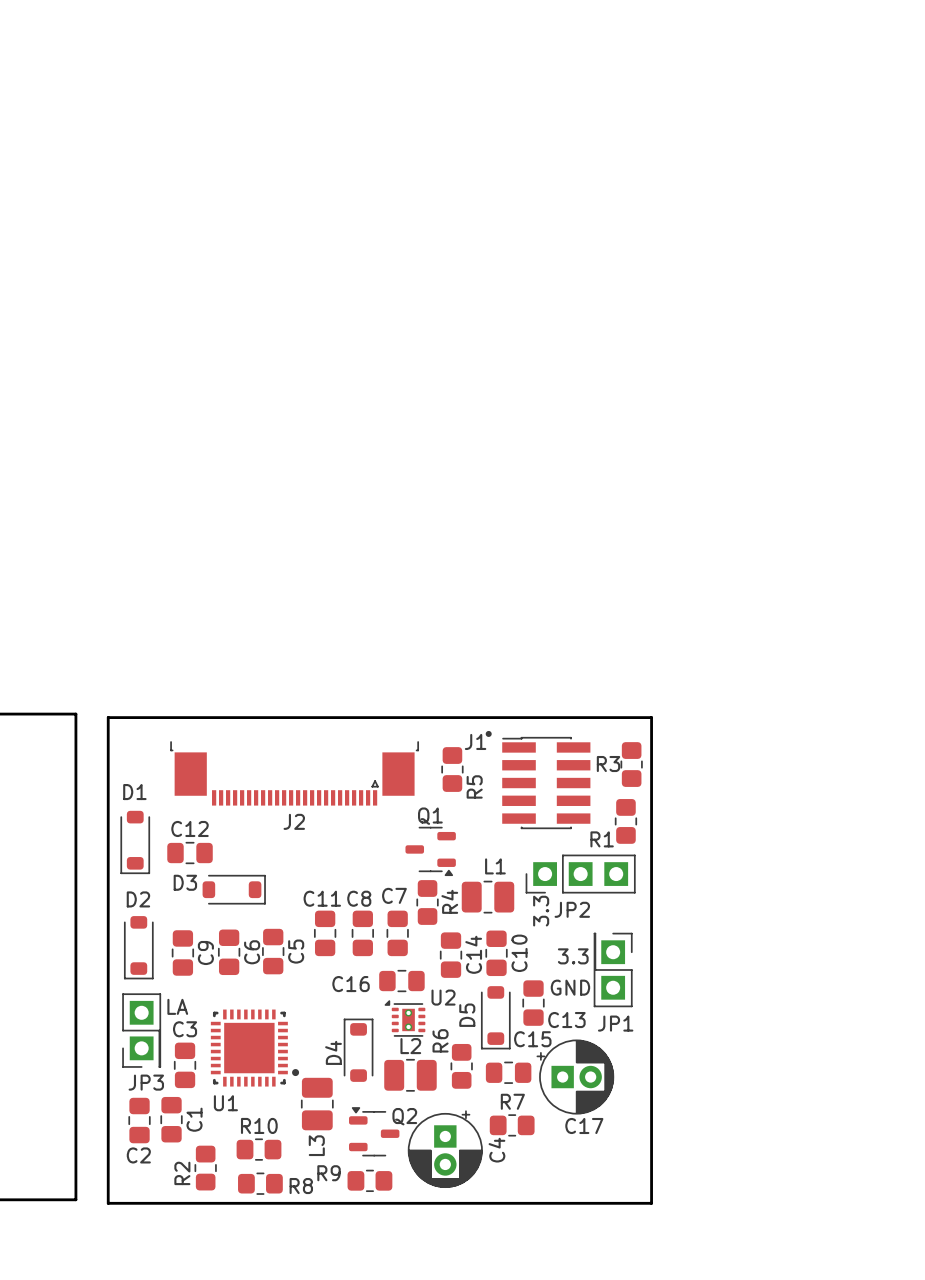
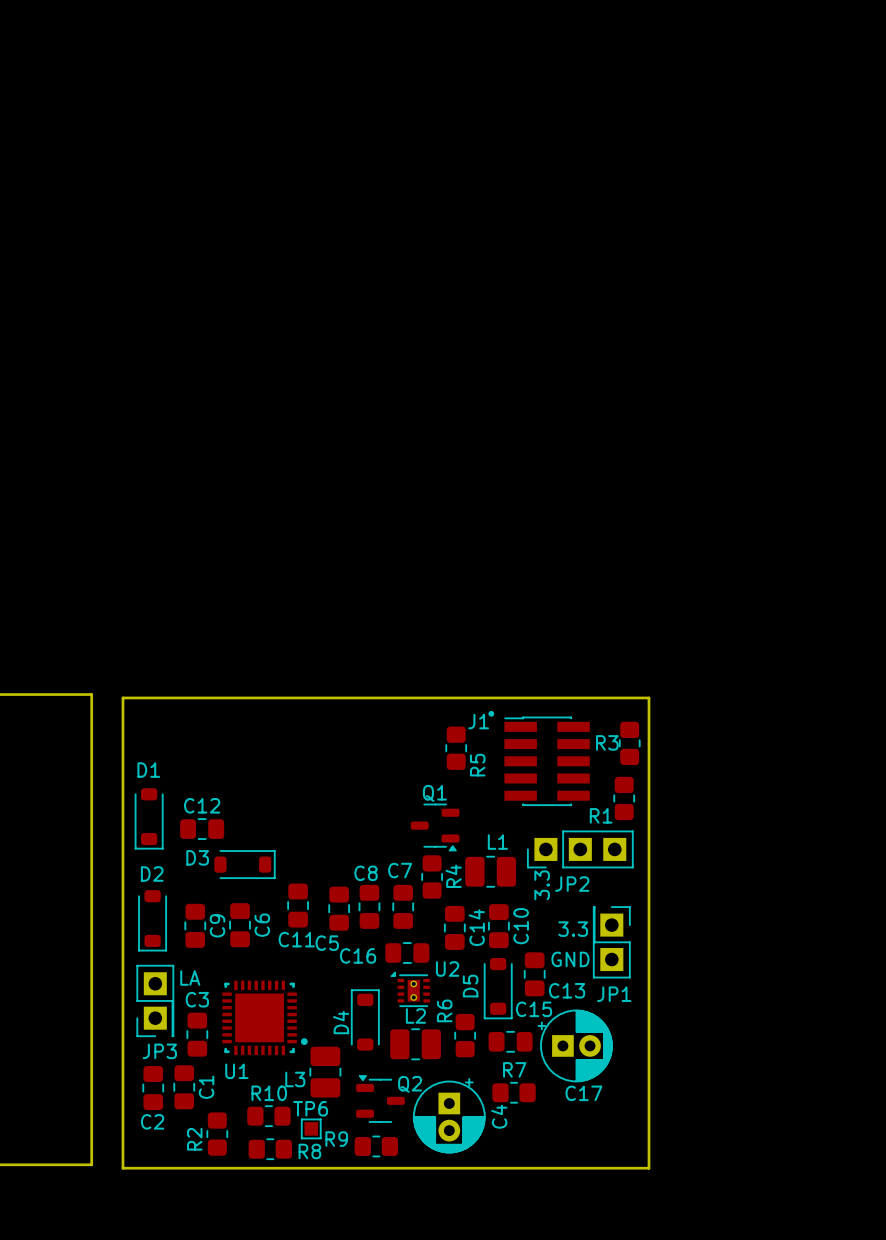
J2: (294, 773) -> none
C11 name position: C11 (322, 898) -> C11 (296, 939)
C11 position: (325, 933) -> (298, 905)
C5 position: (273, 951) -> (339, 908)
C5 name rotation: 0° (296, 951) -> 90° clockwise (327, 943)
L3 name rotation: 0° (316, 1145) -> 90° clockwise (295, 1079)
L3 name position: L3 (316, 1145) -> L3 (295, 1079)
TP6: none -> (311, 1128)

